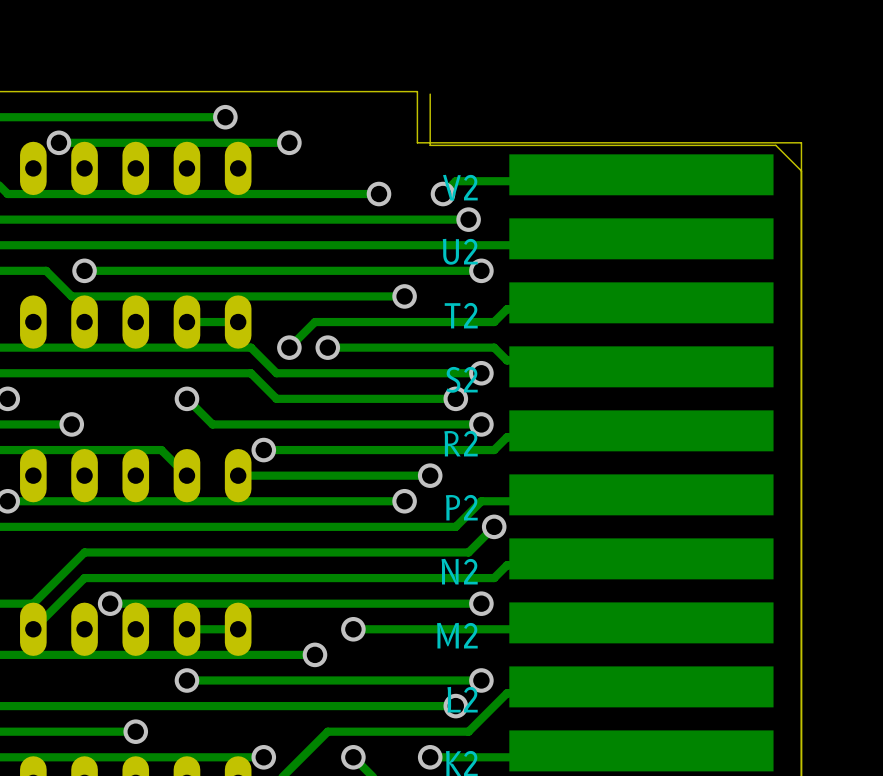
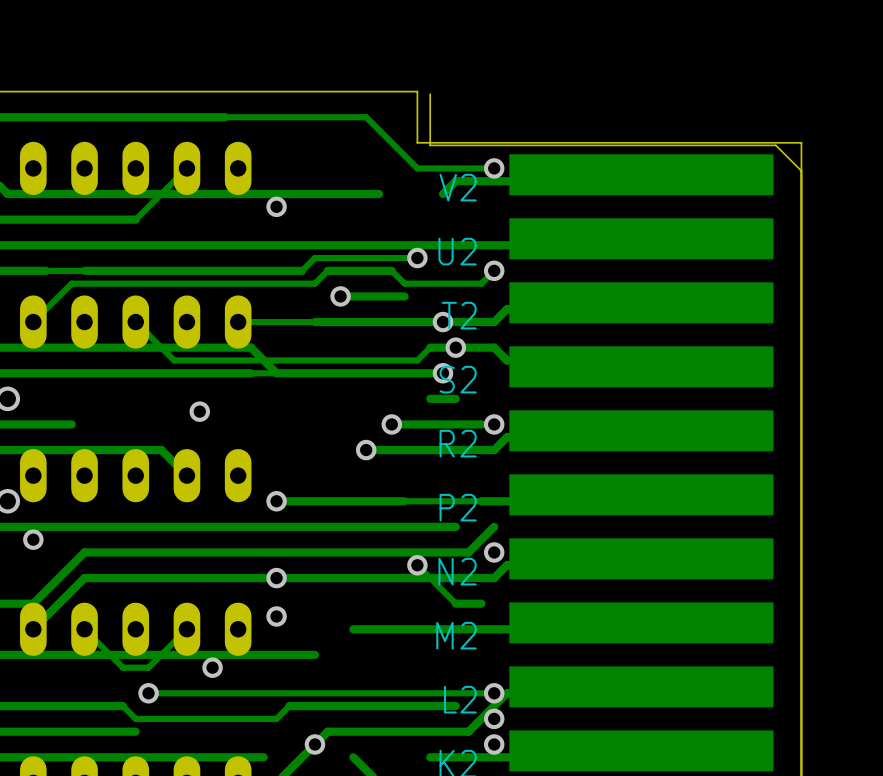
track: none -> (225, 117) (366, 117) (417, 168) (494, 168)
via: (225, 117) -> none
via: (58, 142) -> none
track: (289, 142) (58, 142) -> none
via: (289, 142) -> none
via: none -> (494, 168)
via: (378, 194) -> none
via: (443, 194) -> none
via: none -> (276, 206)
track: (468, 219) (135, 219) -> (186, 168) (135, 219)
via: (468, 219) -> none
via: none -> (417, 258)
track: (46, 270) (71, 296) (340, 296) -> (46, 270) (84, 270)
via: (84, 270) -> none
track: (327, 270) (302, 270) -> (417, 258) (314, 258) (302, 270)
track: none -> (327, 270) (314, 283) (71, 283) (33, 322)
track: (481, 270) (391, 270) -> (494, 270) (481, 283) (404, 283) (391, 270)
via position: (481, 270) -> (494, 270)
via: none -> (340, 296)
via: (404, 296) -> none
track: (238, 322) (186, 322) -> none
track: (314, 322) (289, 347) -> (314, 322) (238, 322)
via: none -> (443, 322)
via: (289, 347) -> none
via: (327, 347) -> none
track: (430, 347) (327, 347) -> (430, 347) (417, 360) (174, 360) (135, 322)
via: none -> (455, 347)
track: (250, 373) (276, 398) (430, 398) -> (250, 373) (276, 373)
via: none -> (443, 373)
track: (481, 373) (443, 373) -> none
via: (481, 373) -> none
track: (186, 398) (212, 424) (391, 424) -> none
via position: (186, 398) -> (199, 411)
via: (455, 398) -> none
via: (71, 424) -> none
via: none -> (391, 424)
via position: (481, 424) -> (494, 424)
via: (263, 450) -> none
track: (366, 450) (263, 450) -> none
via: none -> (366, 450)
track: (430, 475) (238, 475) -> none
via: (430, 475) -> none
track: (276, 501) (7, 501) -> none
via: none -> (276, 501)
via: (404, 501) -> none
track: (481, 501) (455, 526) -> (481, 501) (404, 501)
via: (494, 526) -> none
via: none -> (33, 539)
via: none -> (494, 552)
via: none -> (417, 565)
via: none -> (276, 578)
via: (110, 603) -> none
track: (455, 603) (110, 603) -> (455, 603) (417, 565)
via: (481, 603) -> none
via: none -> (276, 616)
track: (238, 629) (186, 629) -> (84, 629) (122, 667) (148, 667) (186, 629)
via: (353, 629) -> none
via: (314, 654) -> none
via: none -> (212, 667)
via: (186, 680) -> none
track: (481, 680) (186, 680) -> none
via position: (481, 680) -> (494, 693)
via: none -> (148, 693)
track: none -> (494, 693) (148, 693)
track: (289, 706) (122, 706) -> (289, 706) (276, 718) (135, 718) (122, 706)
via: (455, 706) -> none
via: none -> (494, 718)
via: (135, 731) -> none
via: none -> (314, 744)
via: none -> (494, 744)
via: (263, 757) -> none
via: (353, 757) -> none
via: (430, 757) -> none

